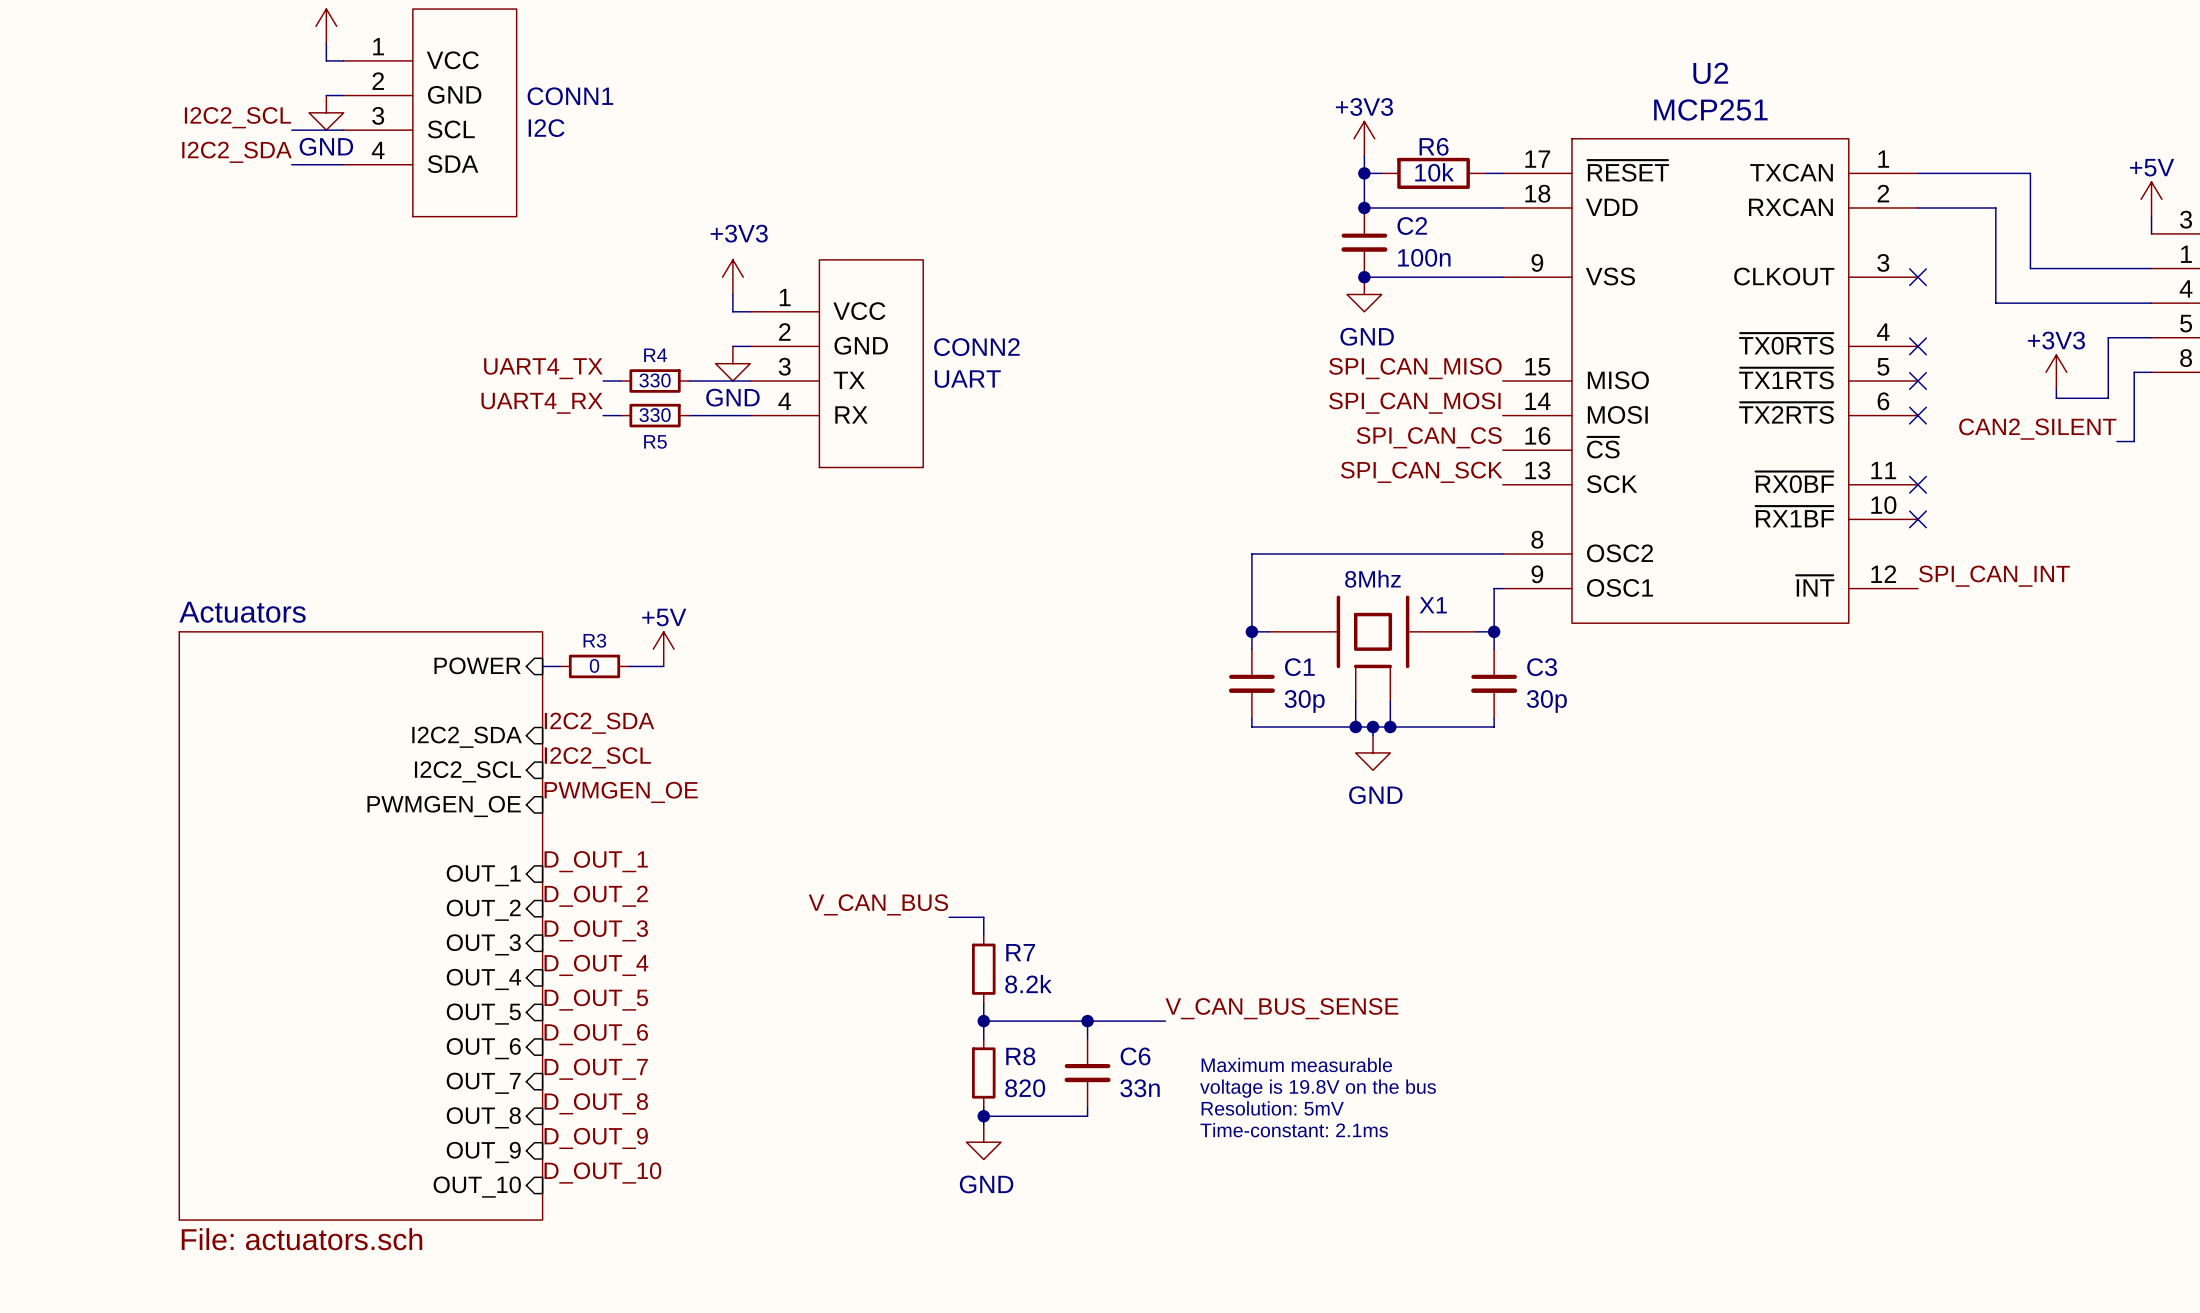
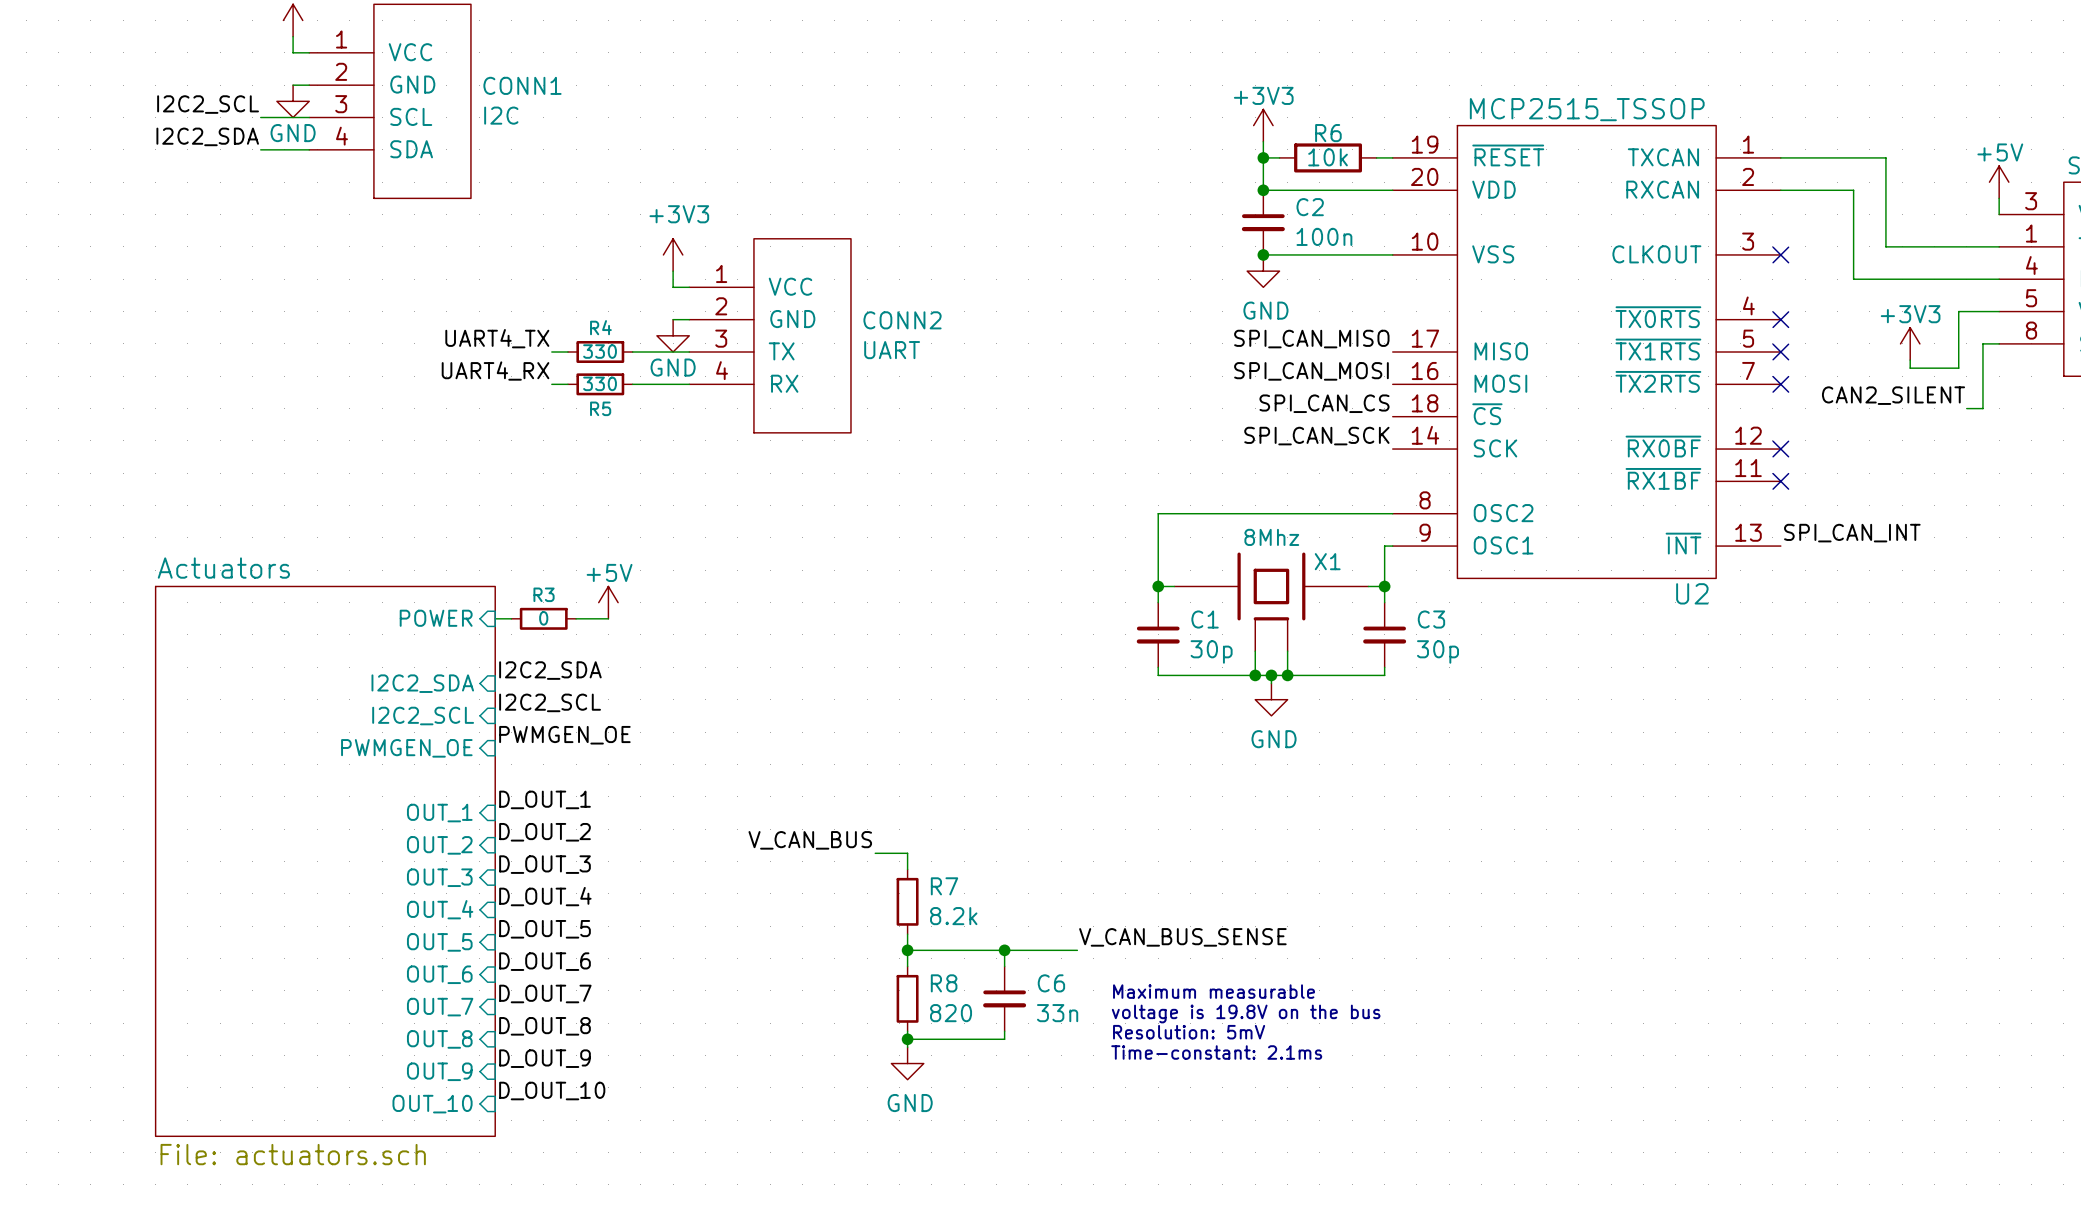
U2 name position: U2 (1710, 73) -> U2 (1692, 593)
U2 value: MCP251 (1710, 109) -> MCP2515_TSSOP (1587, 109)
U2 symbol: [1502, 138, 1918, 624] -> [1392, 125, 1781, 579]

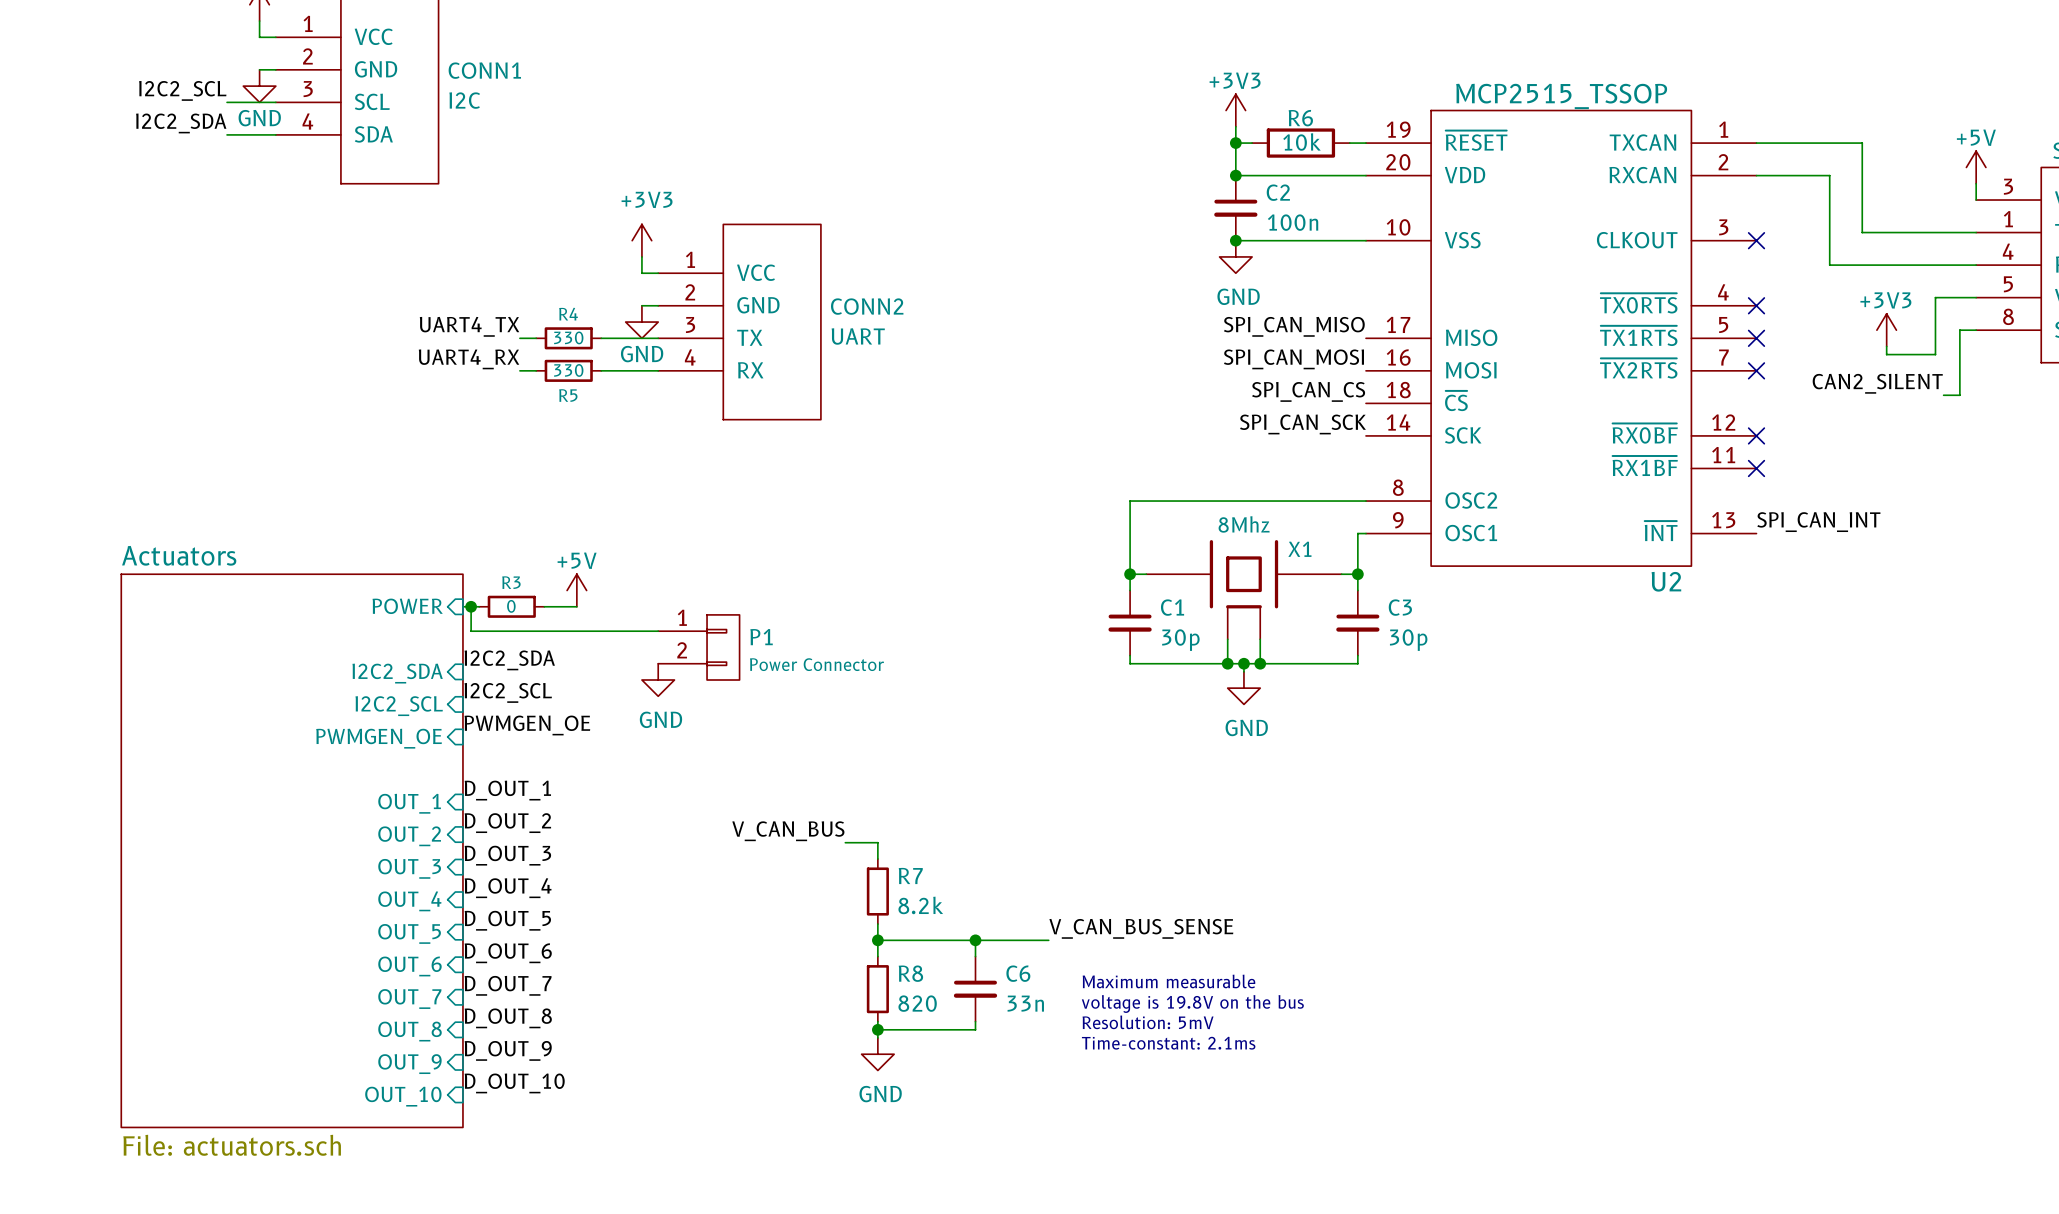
wire: none -> (471, 606) (471, 631) (658, 631)
junction: none -> (471, 606)
P1: none -> Power Connector (698, 647)
power symbol: none -> GND (658, 680)

